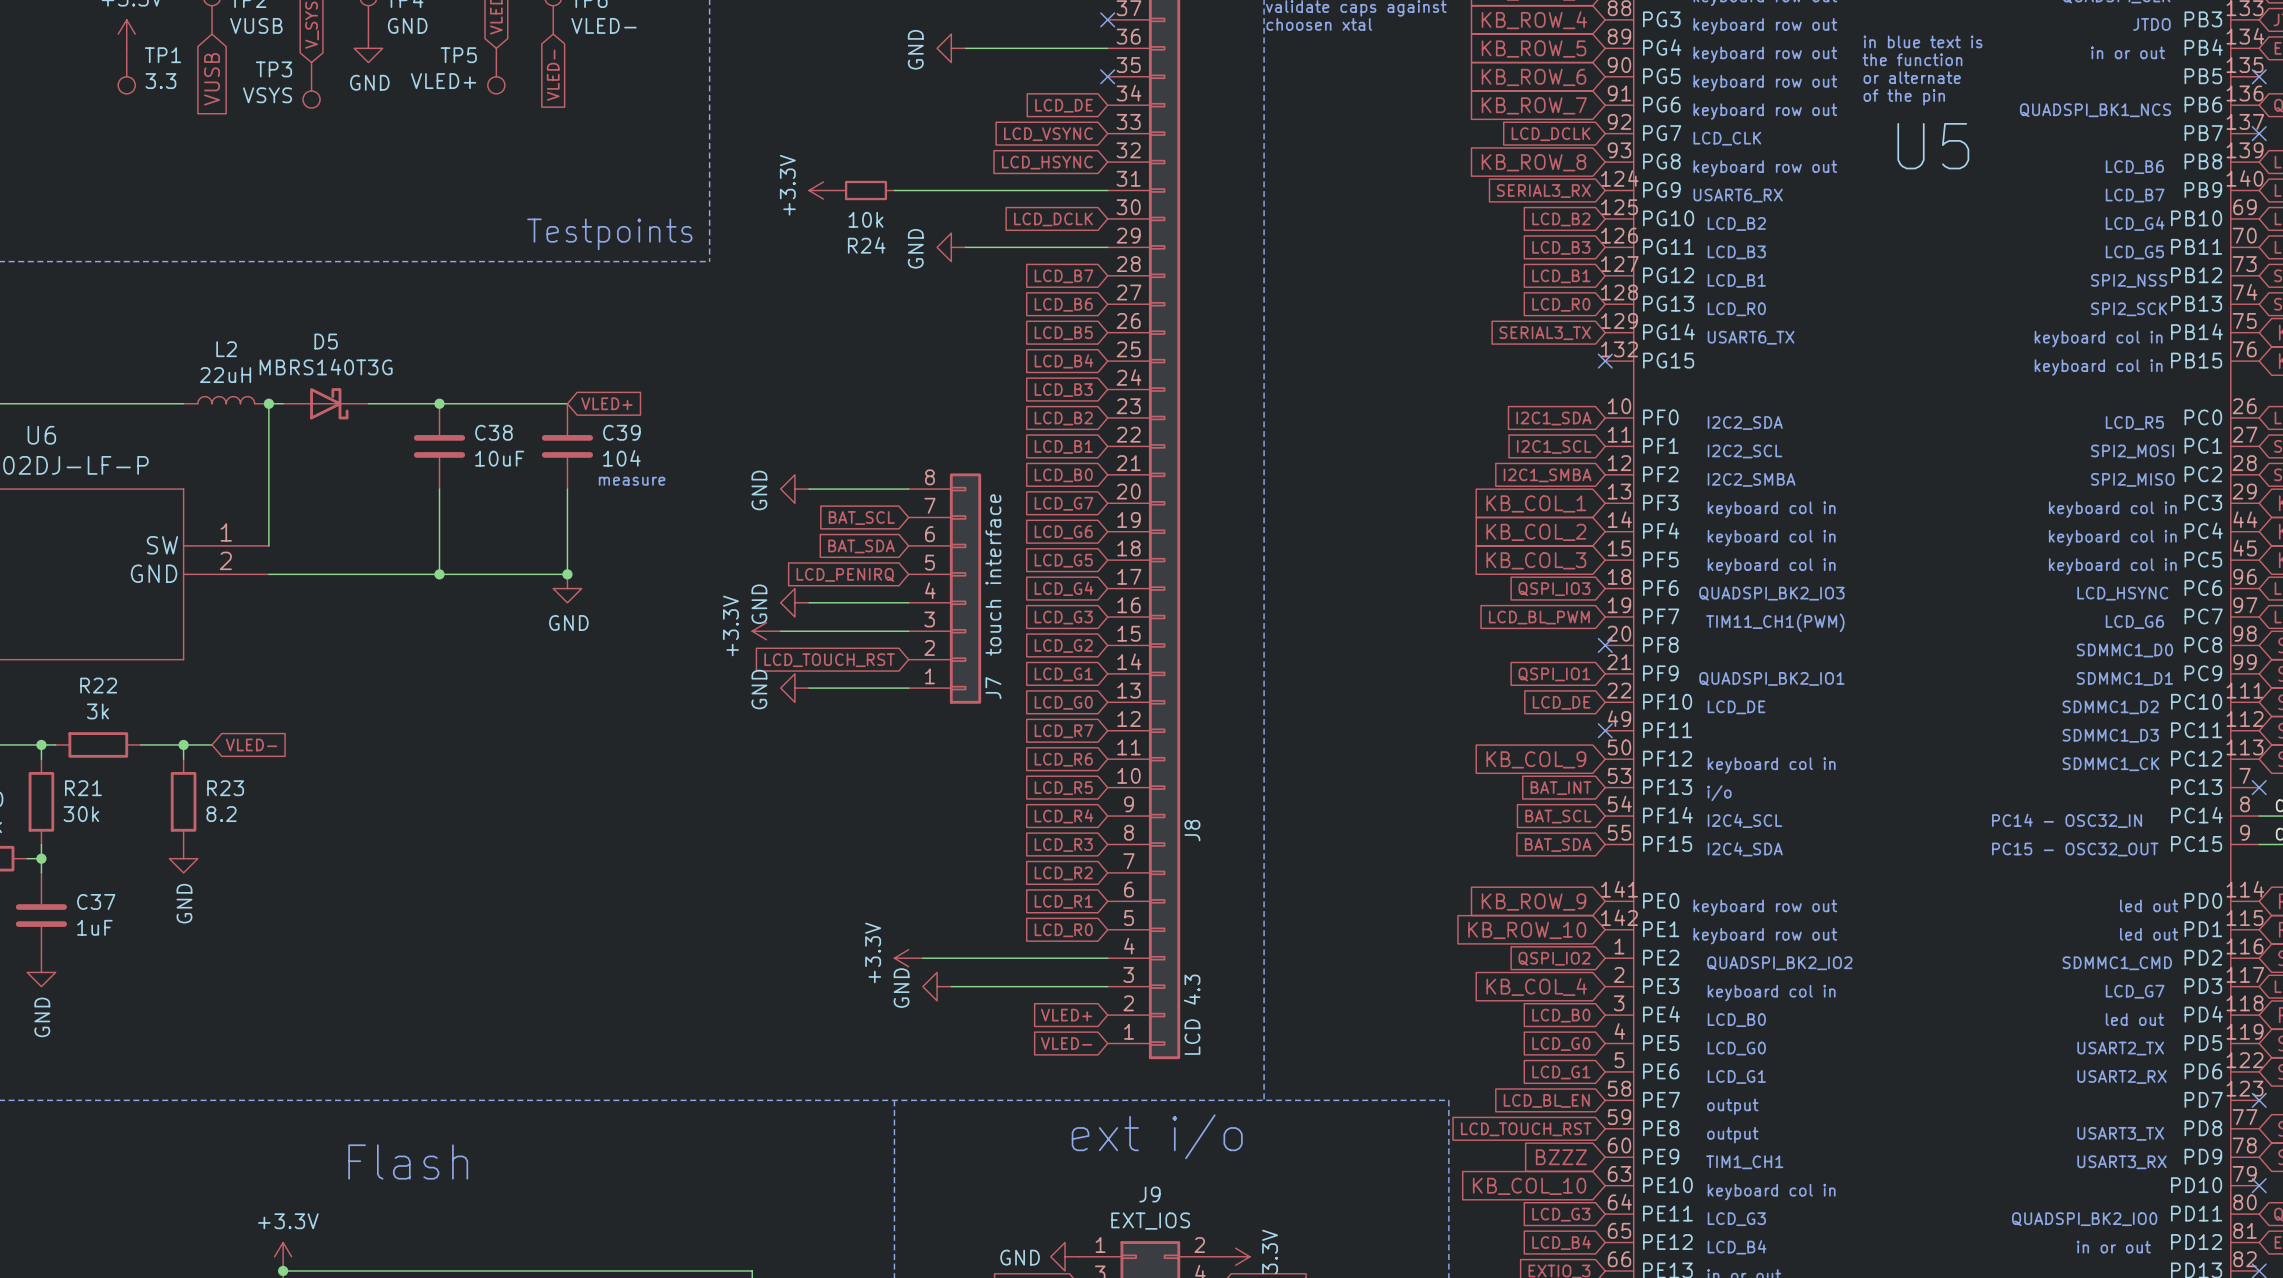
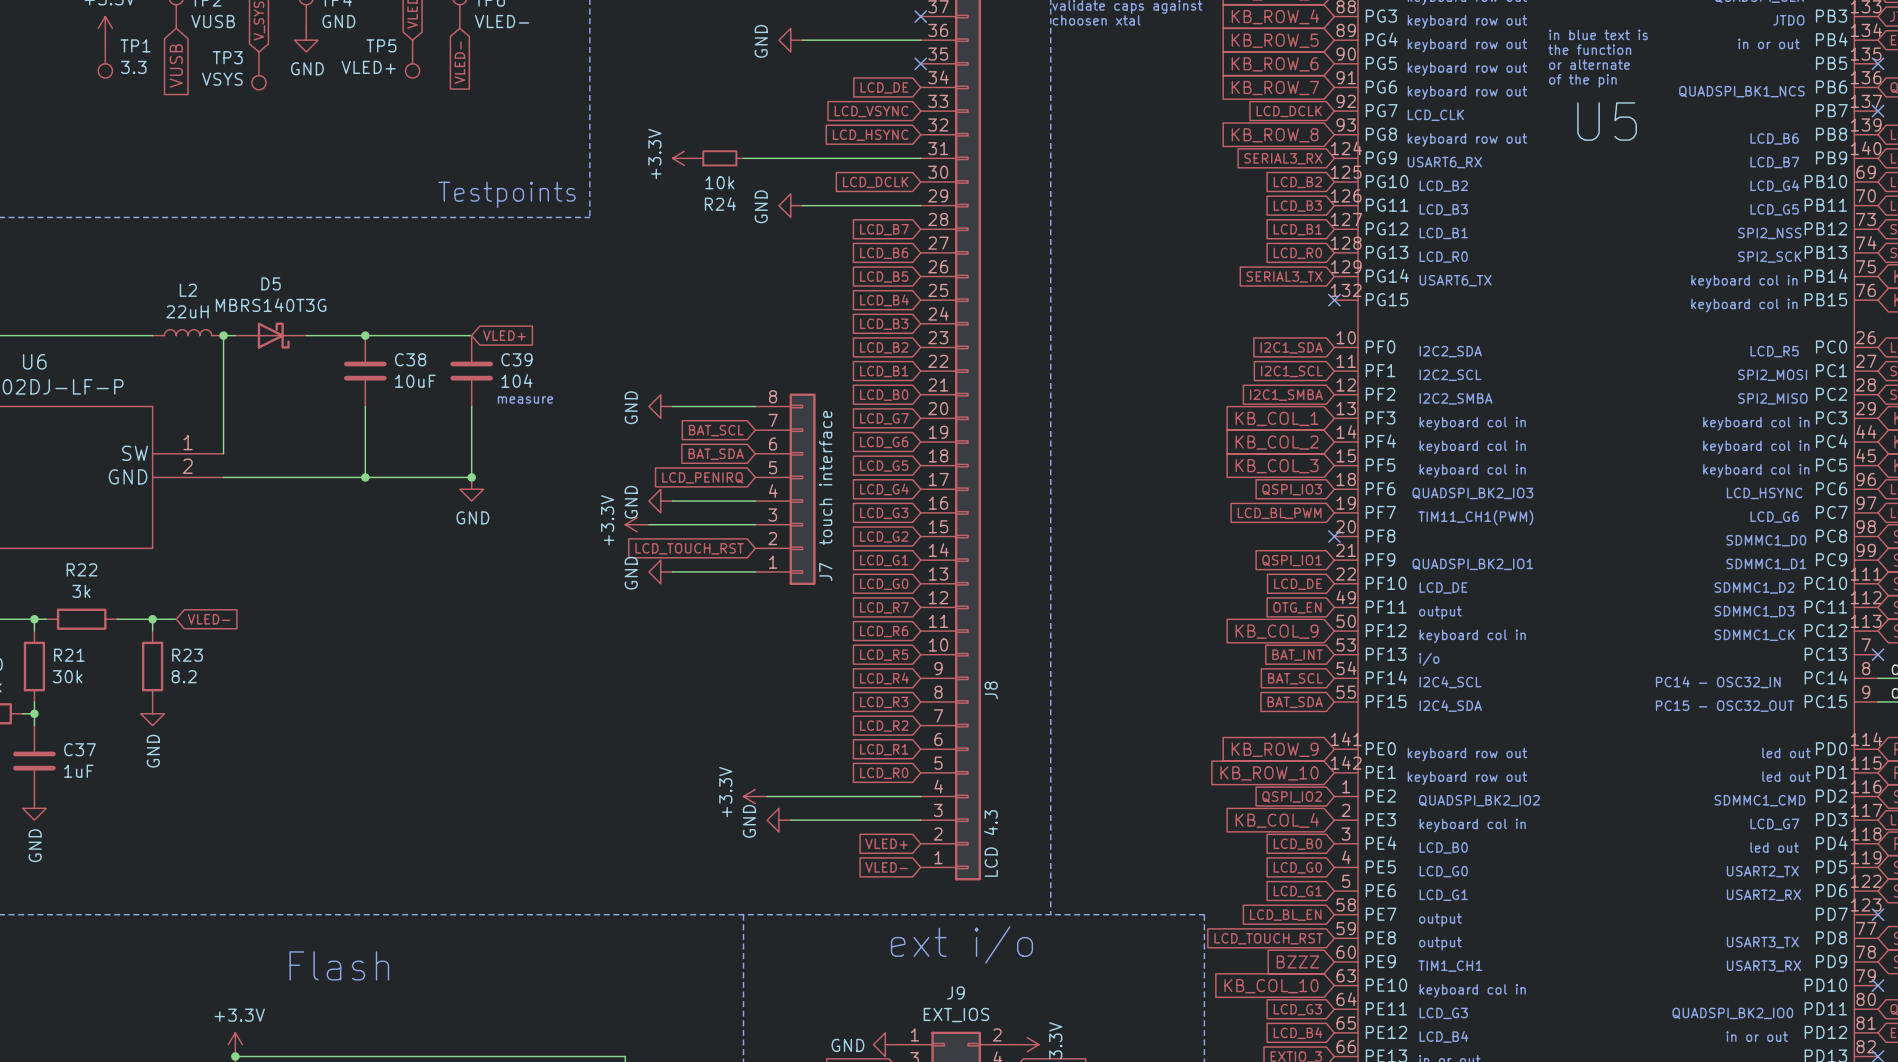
no-connect mark: (1605, 730) -> none
global label: none -> OTG_EN (1297, 607)
text: none -> output (1440, 612)

